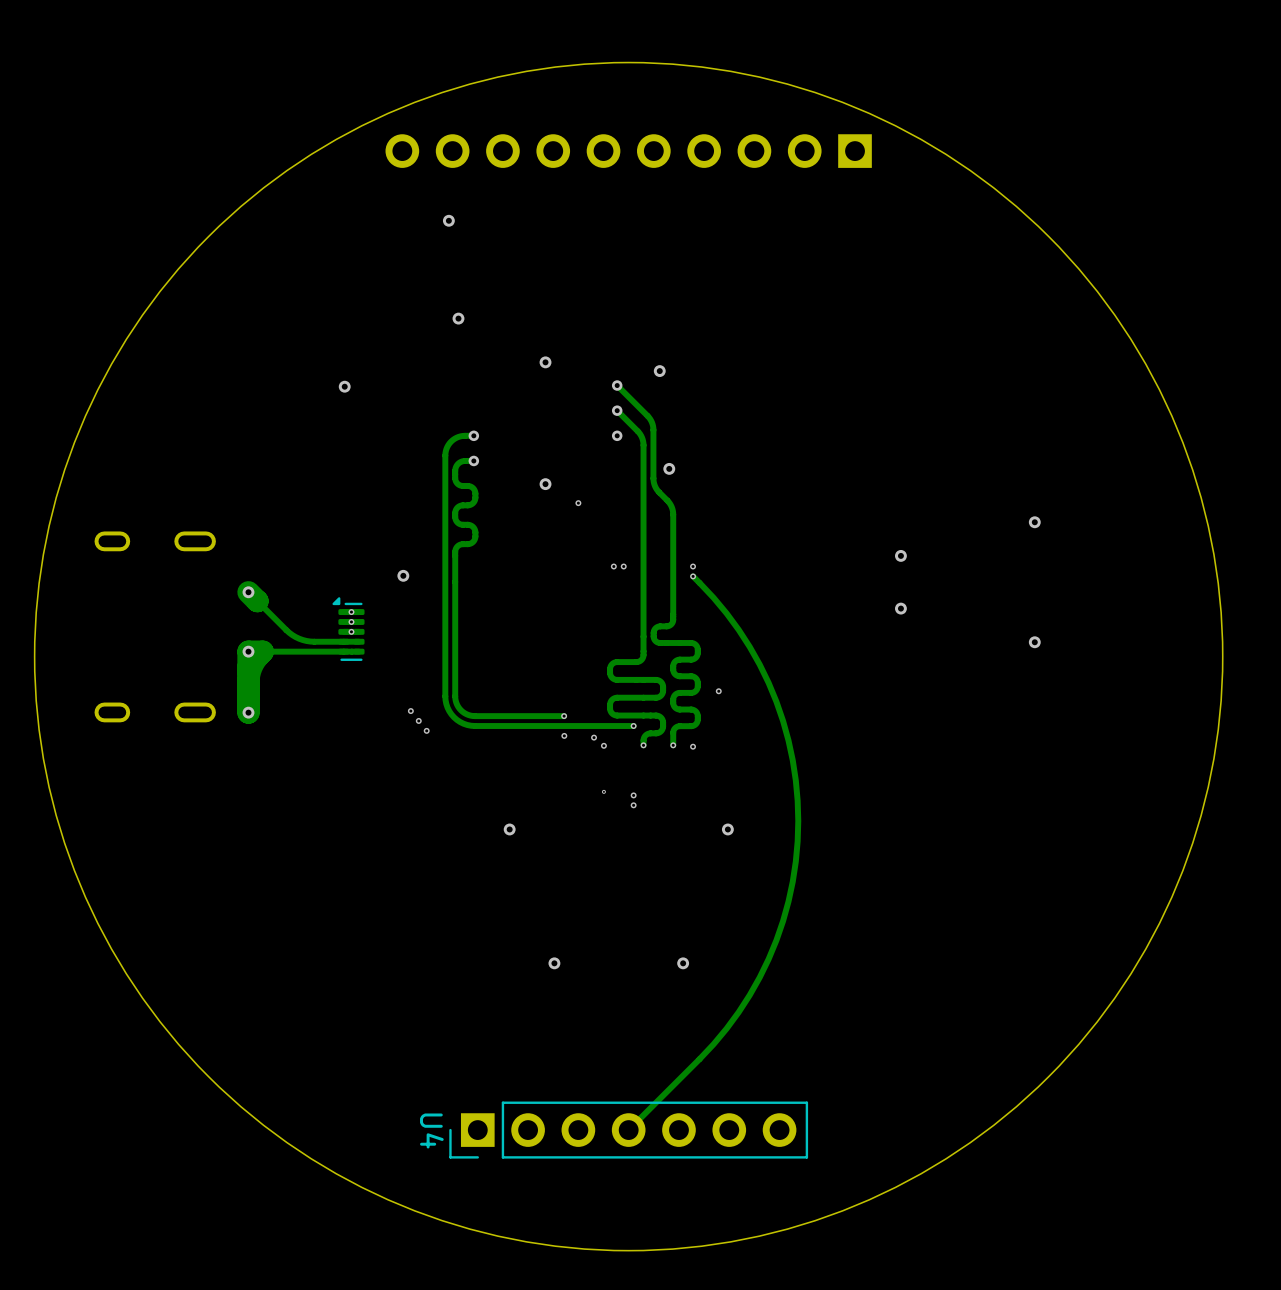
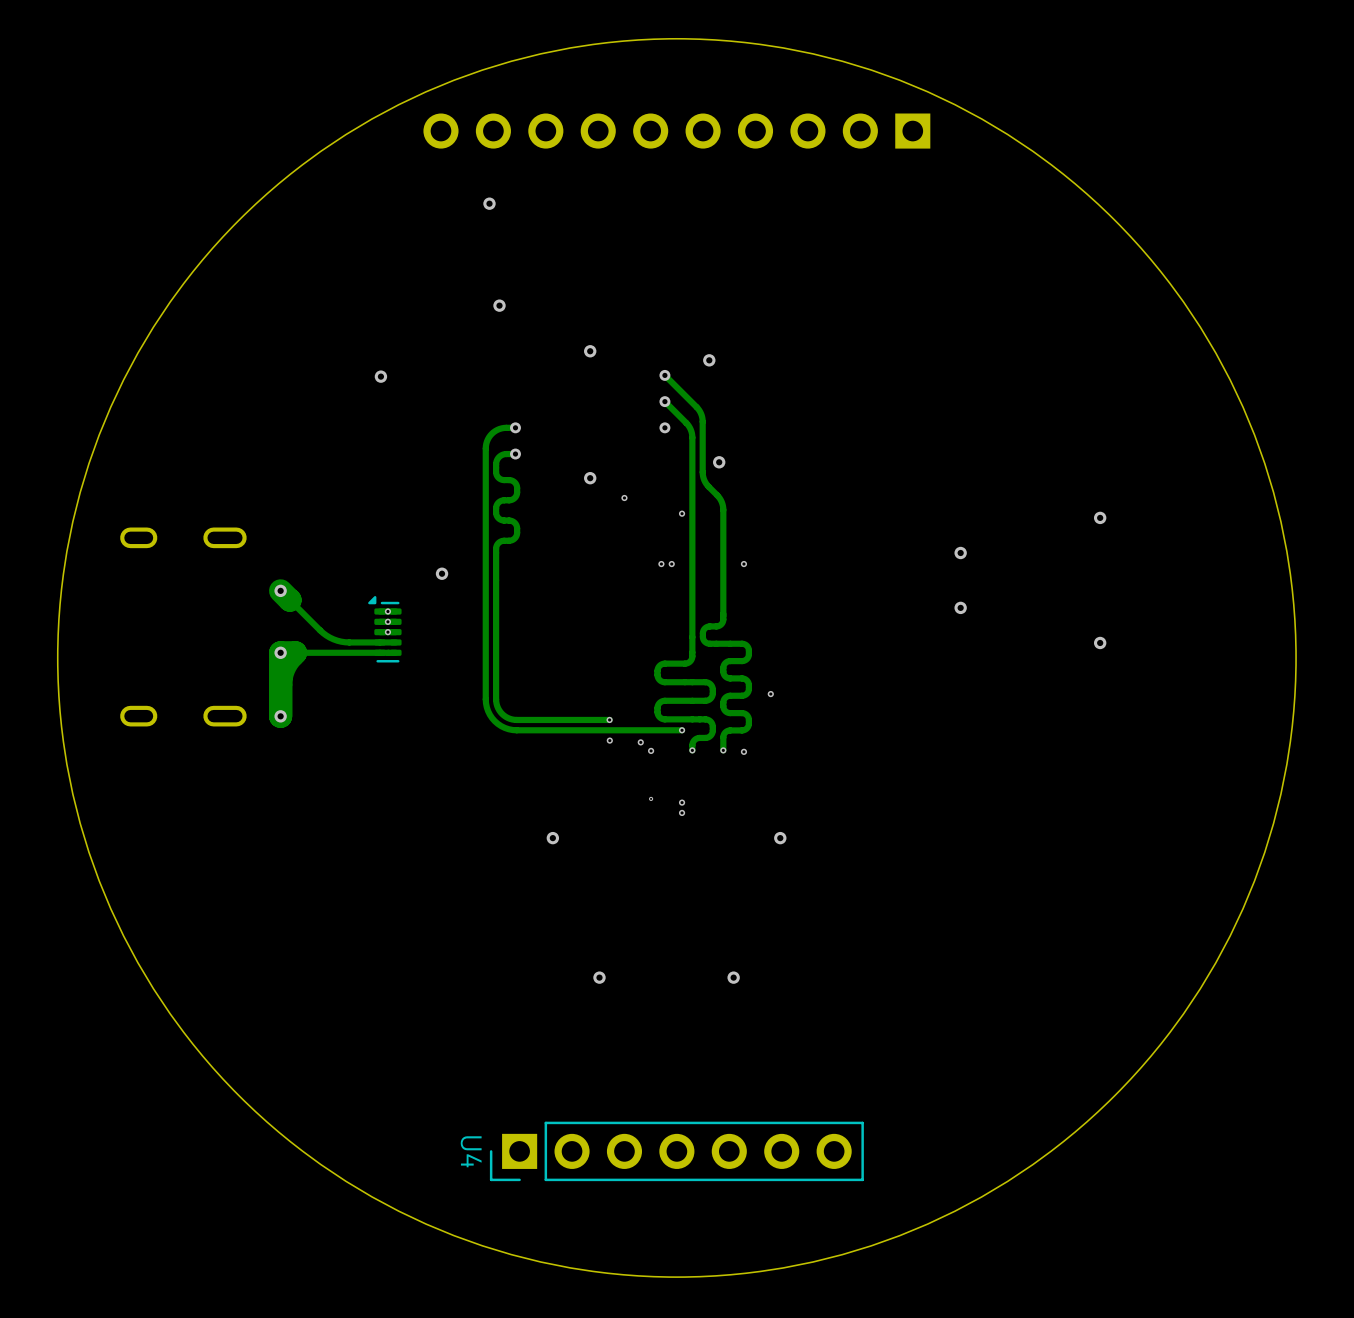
track: (693, 576) (713, 597) (738, 629) (759, 664) (776, 701) (788, 740) (795, 780) (798, 821) (795, 861) (788, 901) (776, 940) (749, 995) (713, 1044) (628, 1130) -> none
via position: (693, 576) -> (682, 513)
via: (410, 711) -> none
via: (418, 720) -> none
via: (426, 730) -> none

